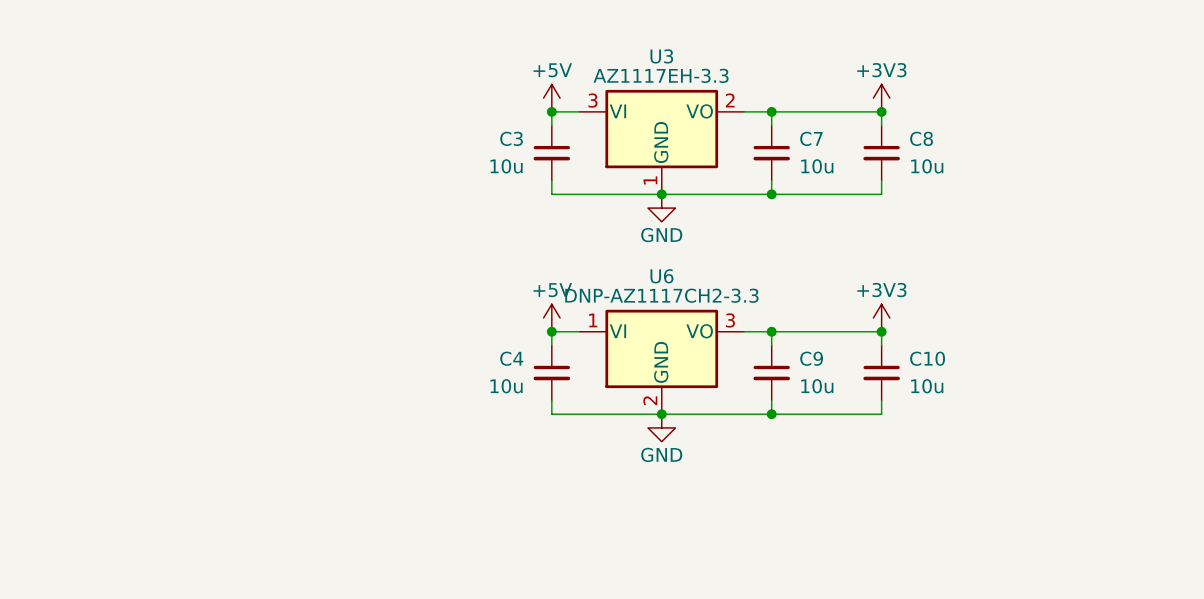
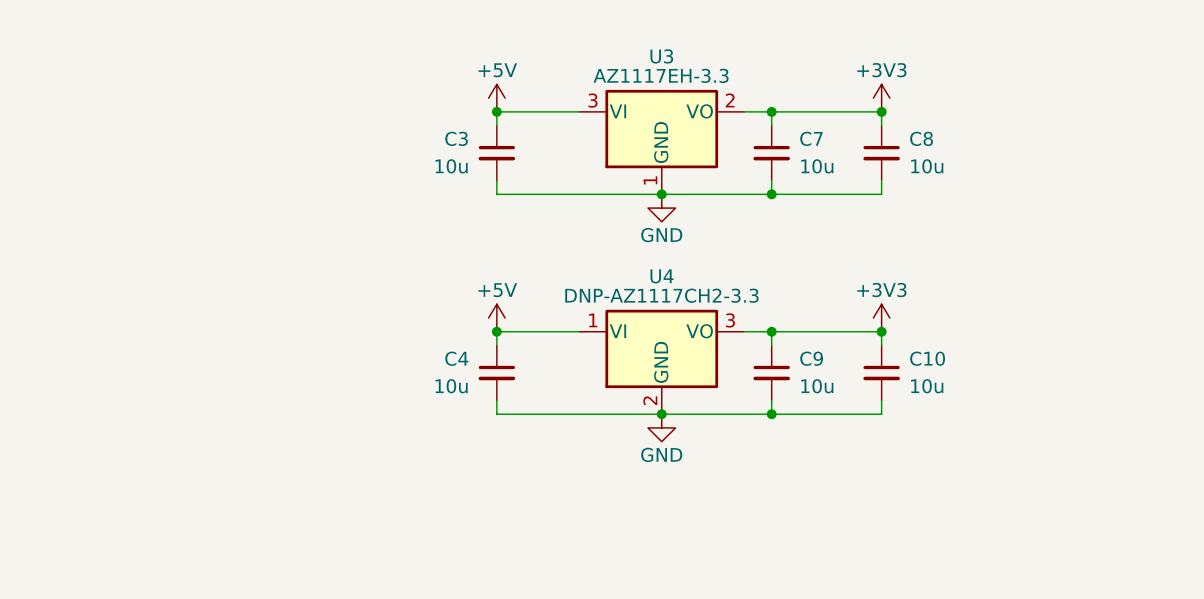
power symbol position: +5V (551, 98) -> +5V (496, 98)
wire: (551, 111) (551, 125) -> (551, 111) (496, 111) (496, 125)
junction position: (551, 111) -> (496, 111)
C3 position: (551, 153) -> (496, 153)
wire: (551, 180) (551, 194) -> (496, 180) (496, 194) (551, 194)
U6 name: U6 (661, 276) -> U4 (662, 276)
power symbol position: +5V (551, 318) -> +5V (496, 318)
wire: (551, 331) (551, 345) -> (551, 331) (496, 331) (496, 345)
junction position: (551, 331) -> (496, 331)
C4 position: (551, 372) -> (496, 372)
wire: (551, 400) (551, 414) -> (496, 400) (496, 414) (551, 414)

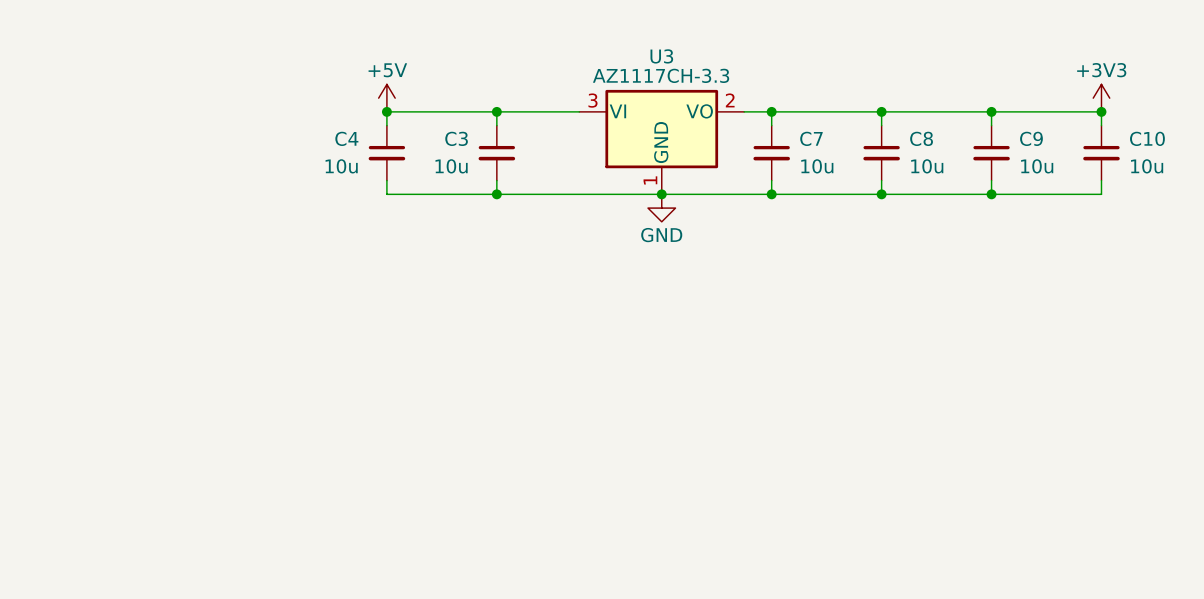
U3 value: AZ1117EH-3.3 (661, 75) -> AZ1117CH-3.3 (661, 75)
power symbol position: +5V (496, 98) -> +5V (386, 98)
power symbol: +3V3 (881, 98) -> none
power symbol: none -> +3V3 (1101, 98)
junction: none -> (386, 111)
wire: none -> (496, 111) (386, 111) (386, 125)
wire: none -> (881, 111) (1101, 111) (1101, 125)
wire: none -> (991, 111) (991, 125)
junction: none -> (991, 111)
junction: none -> (1101, 111)
wire: none -> (386, 180) (386, 194) (496, 194)
wire: none -> (1101, 180) (1101, 194) (881, 194)
junction: none -> (496, 194)
junction: none -> (881, 194)
junction: none -> (991, 194)
power symbol: +5V (496, 318) -> none
power symbol: +3V3 (881, 318) -> none
junction: (496, 331) -> none
wire: (579, 331) (496, 331) (496, 345) -> none
wire: (744, 331) (881, 331) (881, 345) -> none
wire: (771, 331) (771, 345) -> (991, 180) (991, 194)
junction: (771, 331) -> none
junction: (881, 331) -> none
U4: DNP-AZ1117CH2-3.3 (661, 361) -> none
C4 position: (496, 372) -> (386, 153)
C9 position: (771, 372) -> (991, 153)
C10 position: (881, 372) -> (1101, 153)
wire: (496, 400) (496, 414) (881, 414) (881, 400) -> none
wire: (771, 400) (771, 414) -> none
junction: (661, 414) -> none
junction: (771, 414) -> none
power symbol: GND (661, 427) -> none

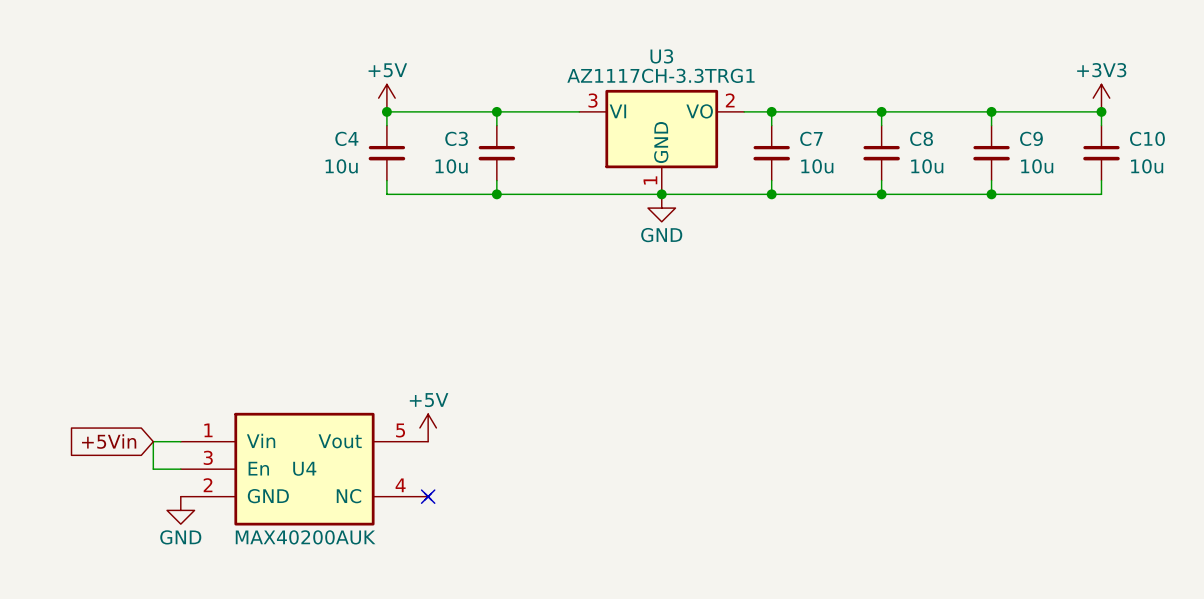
U3 value: AZ1117CH-3.3 (661, 75) -> AZ1117CH-3.3TRG1 (660, 75)
power symbol: none -> +5V (428, 427)
global label: none -> +5Vin (109, 441)
wire: none -> (180, 441) (153, 441) (153, 469) (180, 469)
U4: none -> MAX40200AUK (306, 469)
no-connect mark: none -> (428, 496)
power symbol: none -> GND (180, 510)

